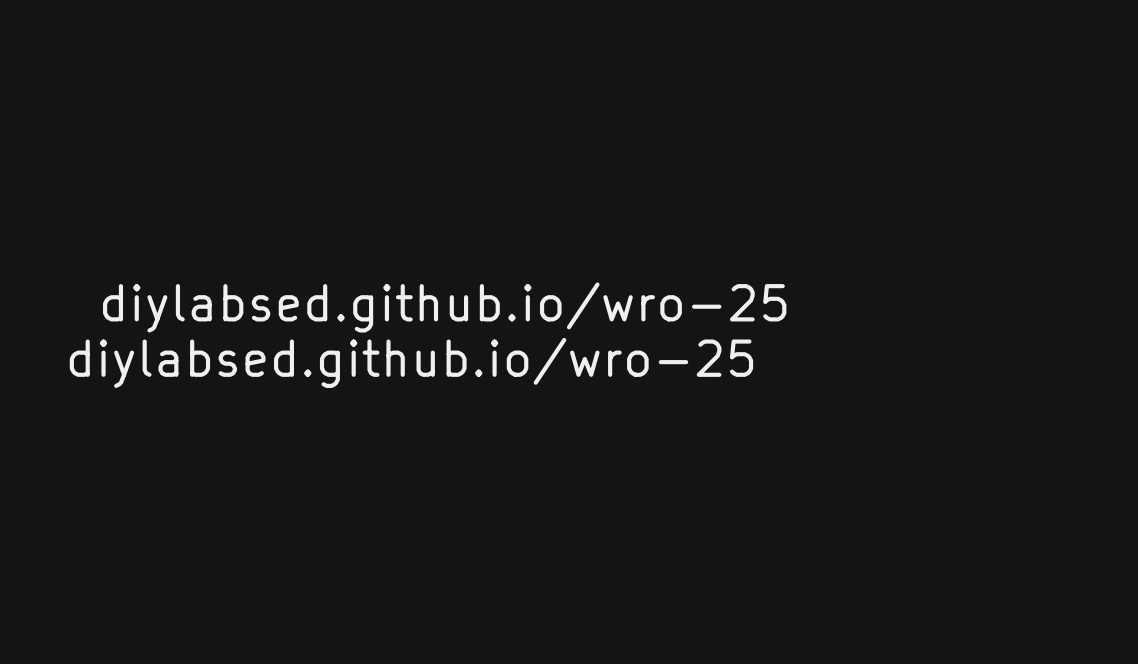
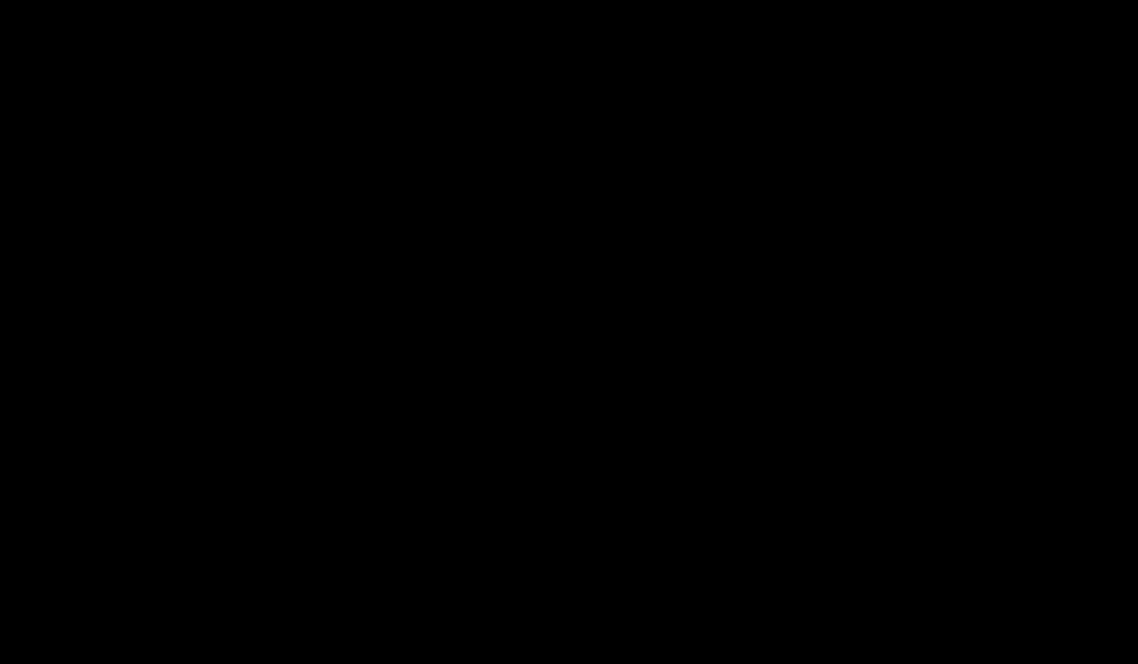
text: diylabsed.github.io/wro-25 (444, 307) -> none
text: diylabsed.github.io/wro-25 (411, 362) -> none

